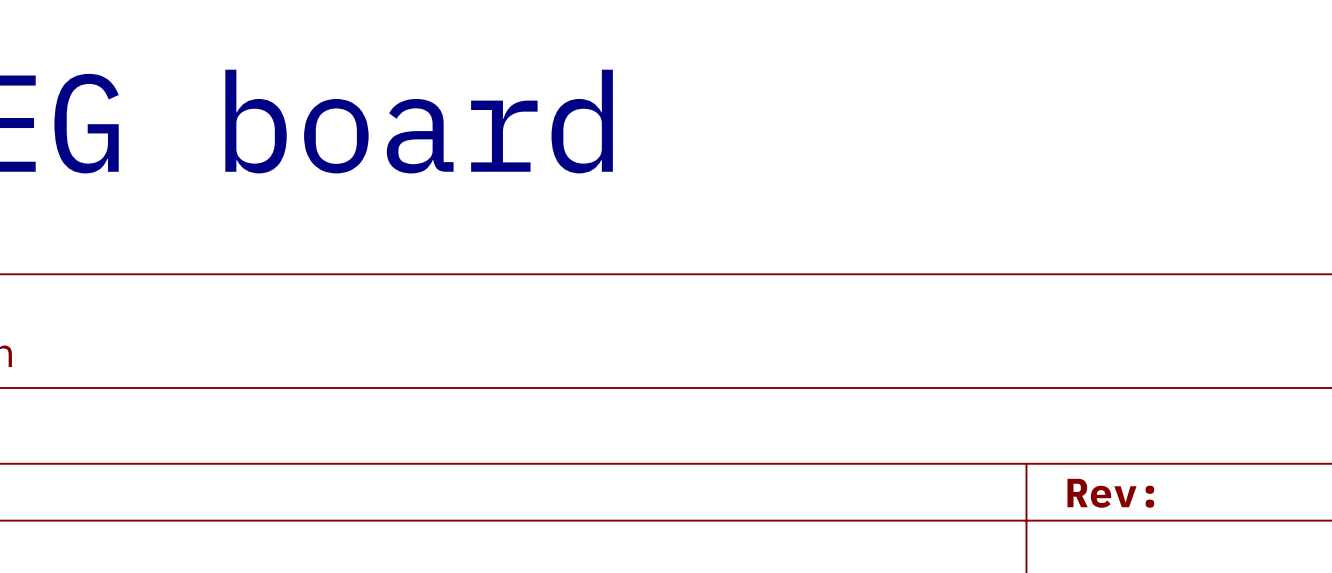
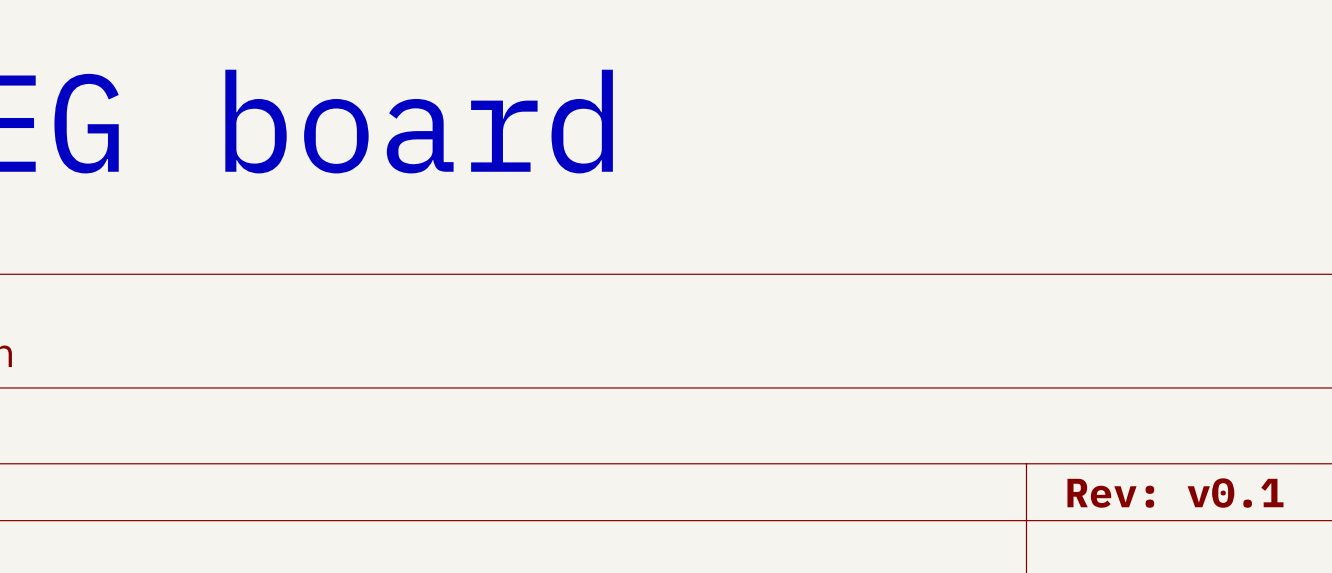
title block: Rev: (1110, 493) -> Rev: v0.1 (1175, 493)

